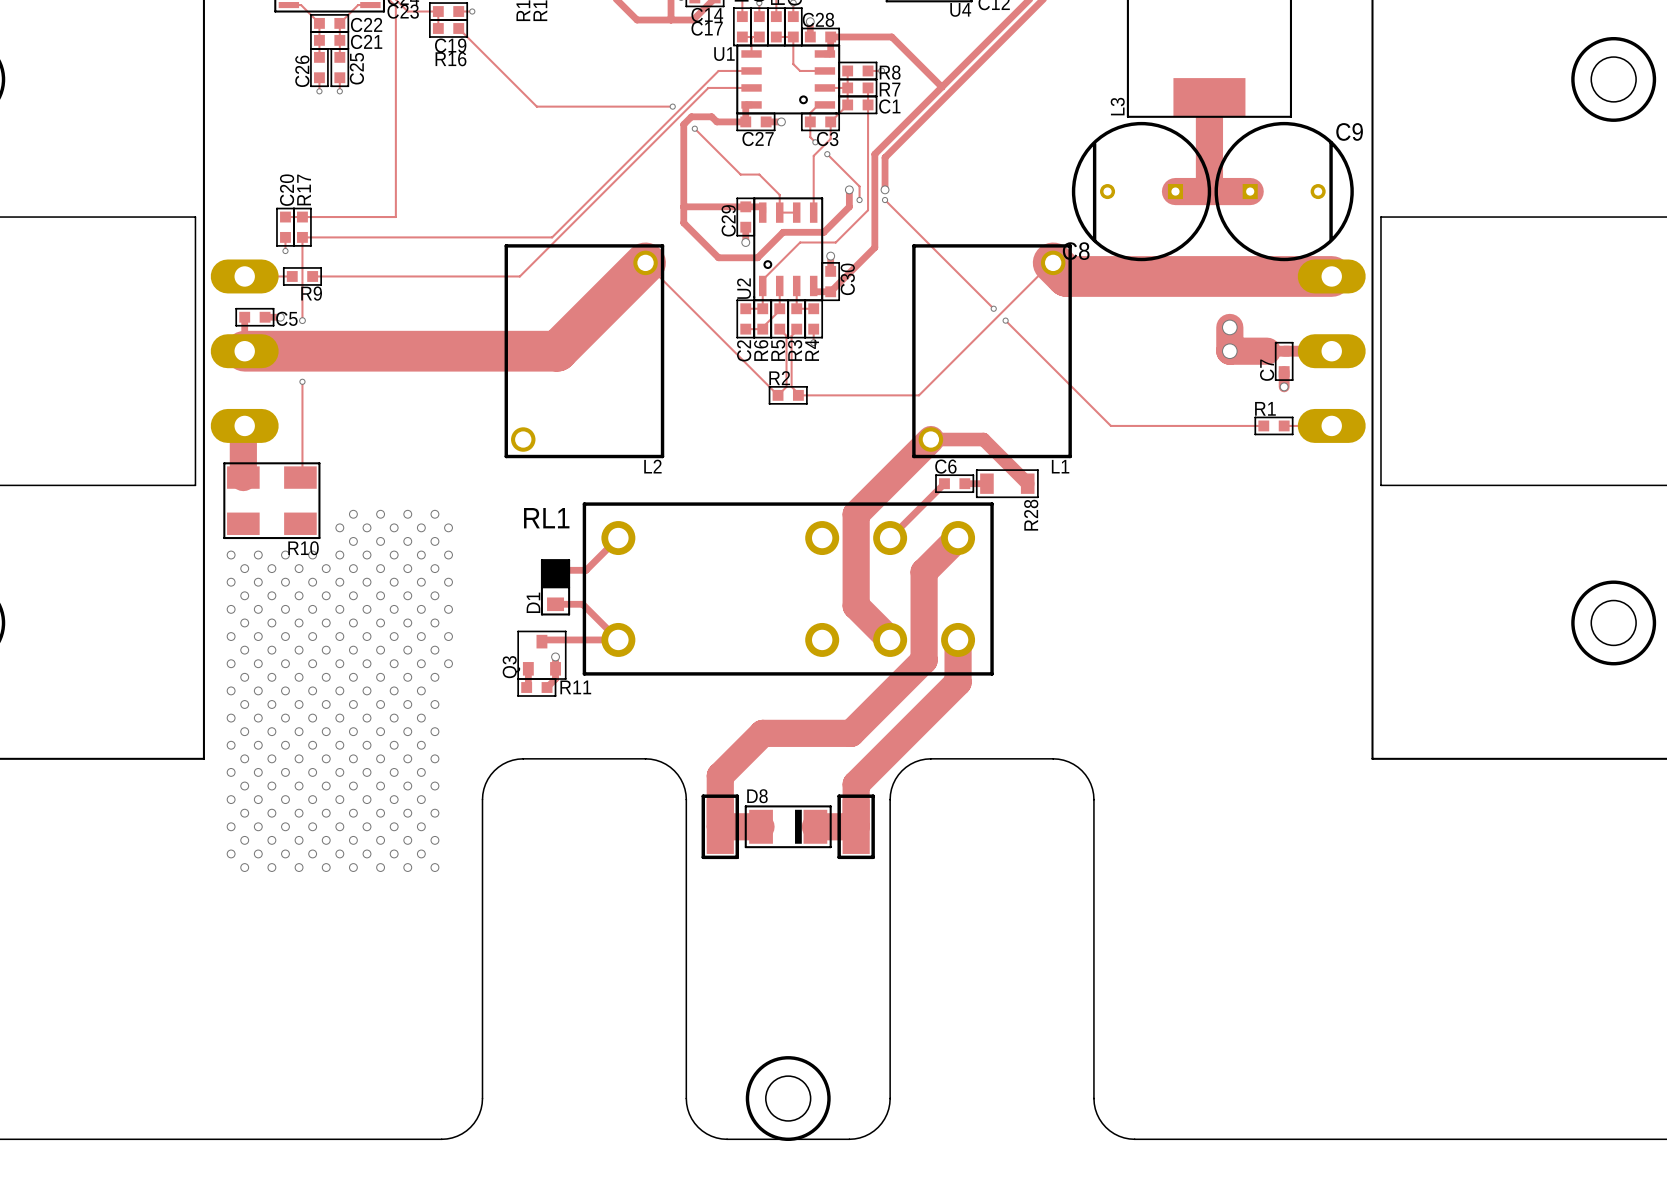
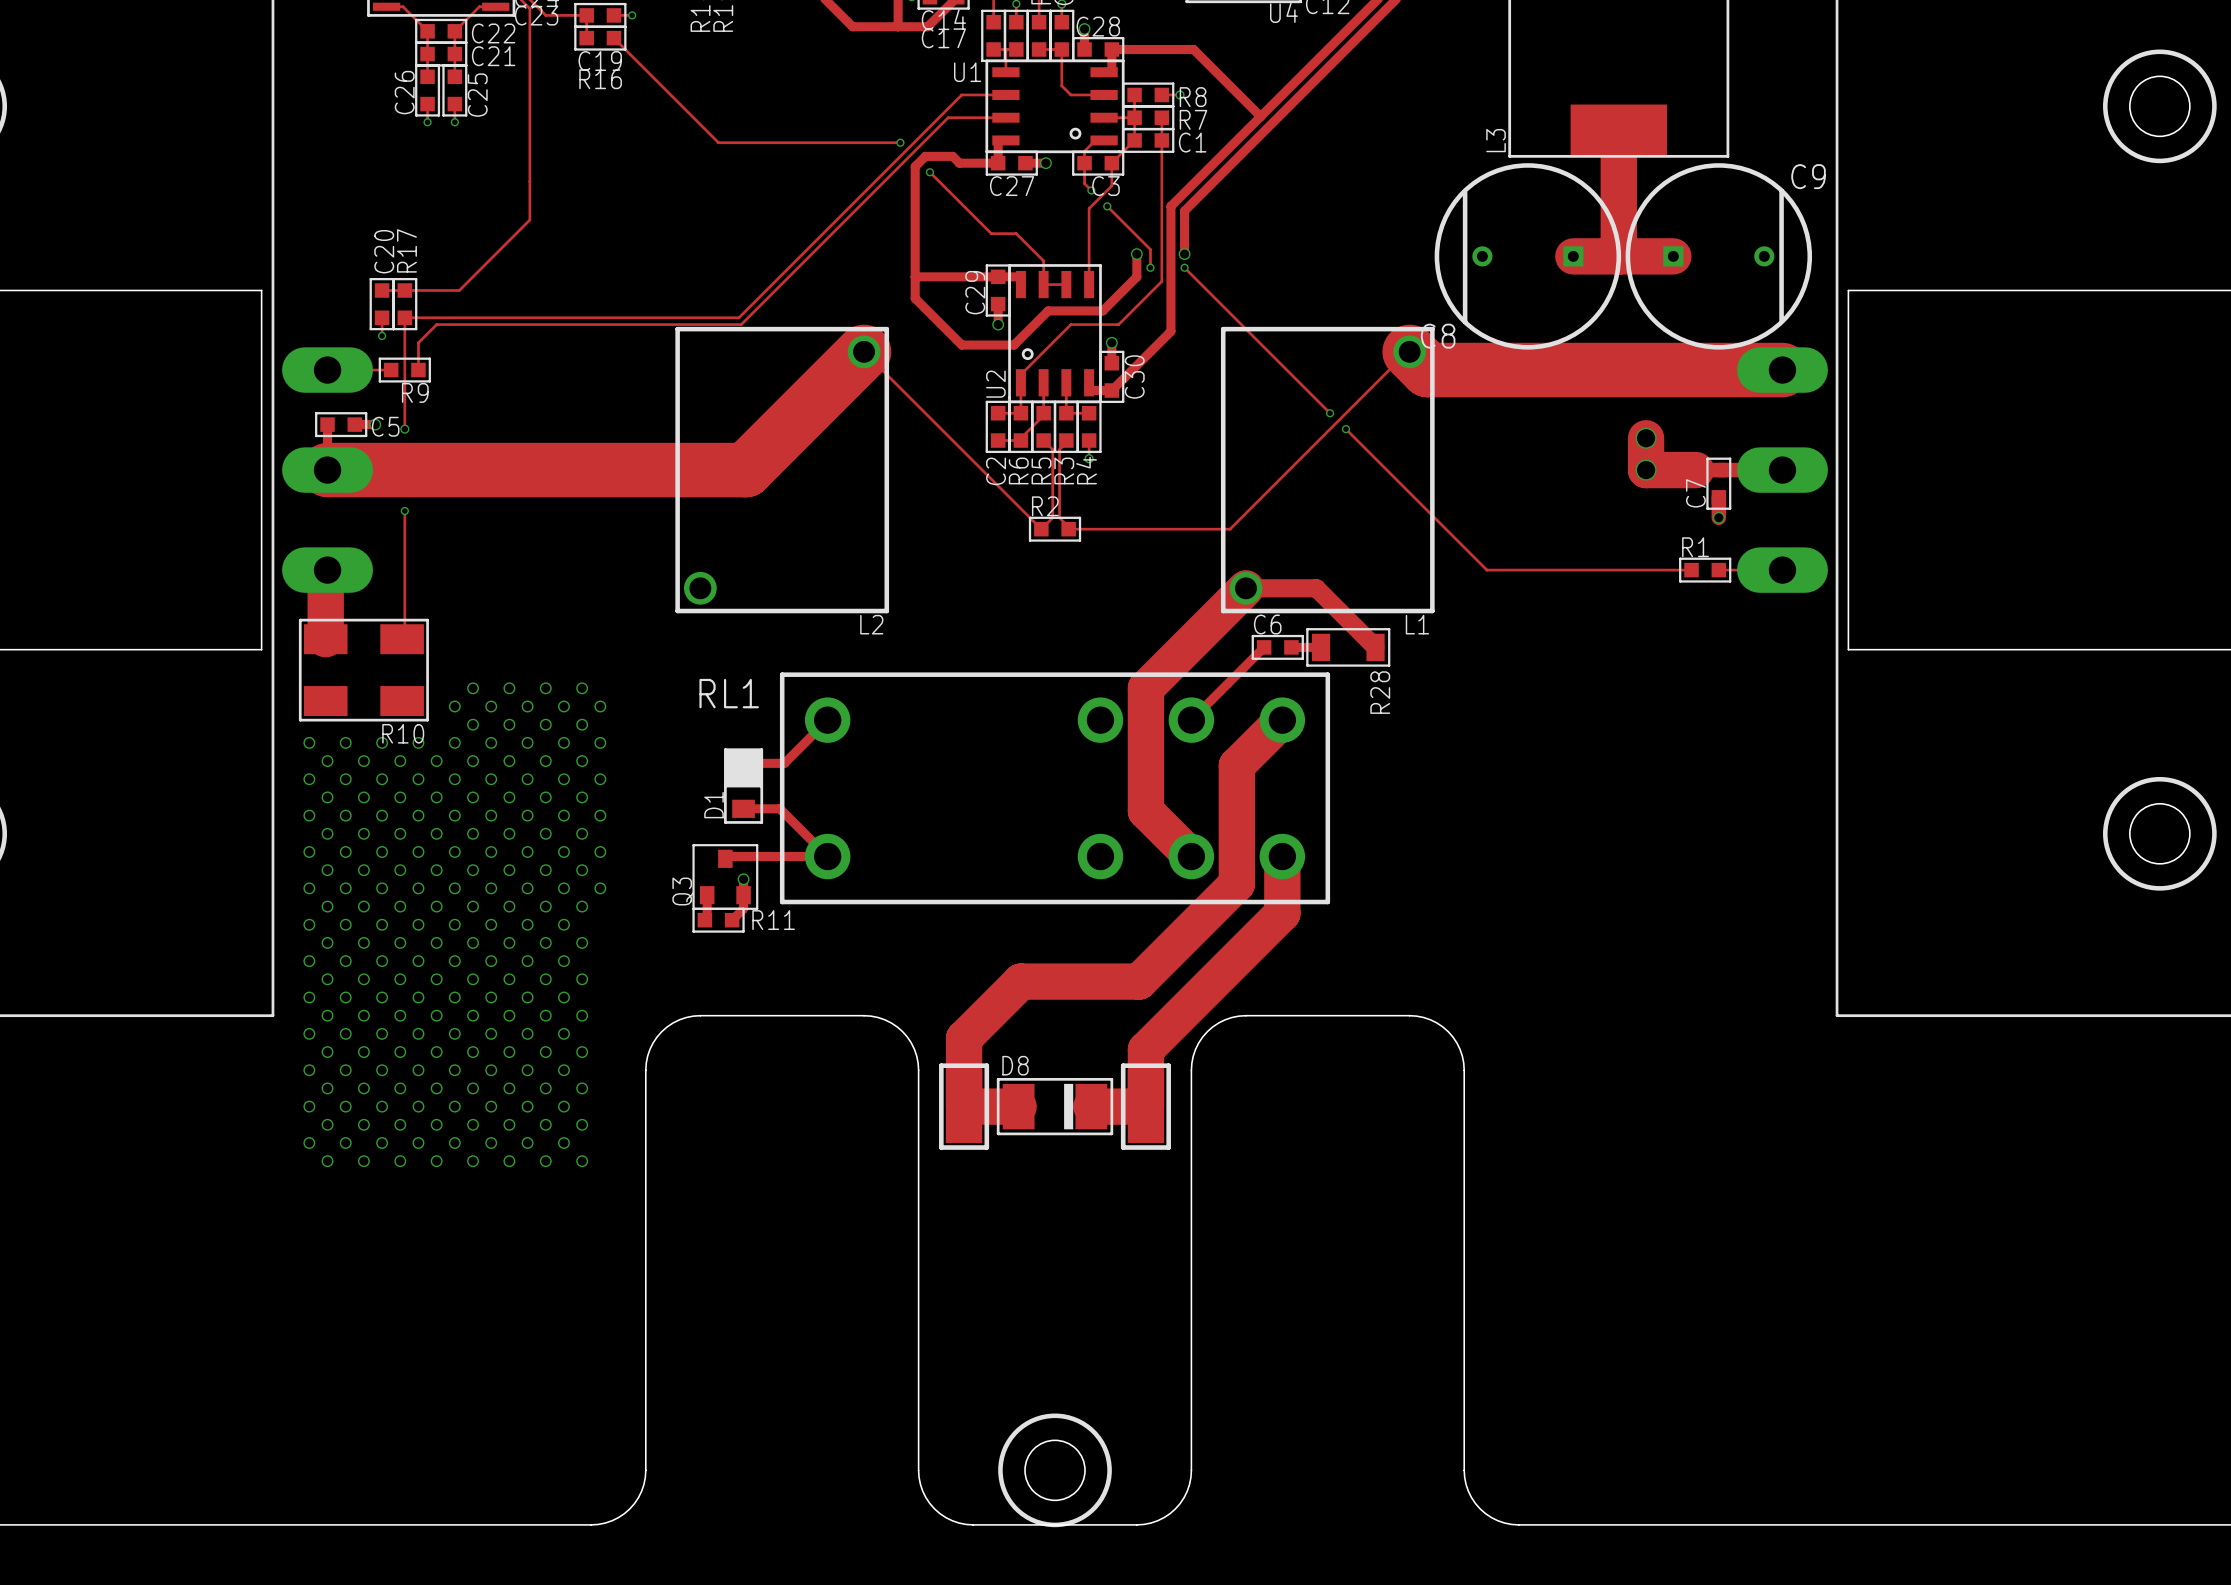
track: (395, 164) (395, 217) (343, 217) -> (529, 220) (459, 290)
track: (553, 242) (519, 276) (312, 276) -> (741, 324) (436, 324) (418, 342) (418, 370)

